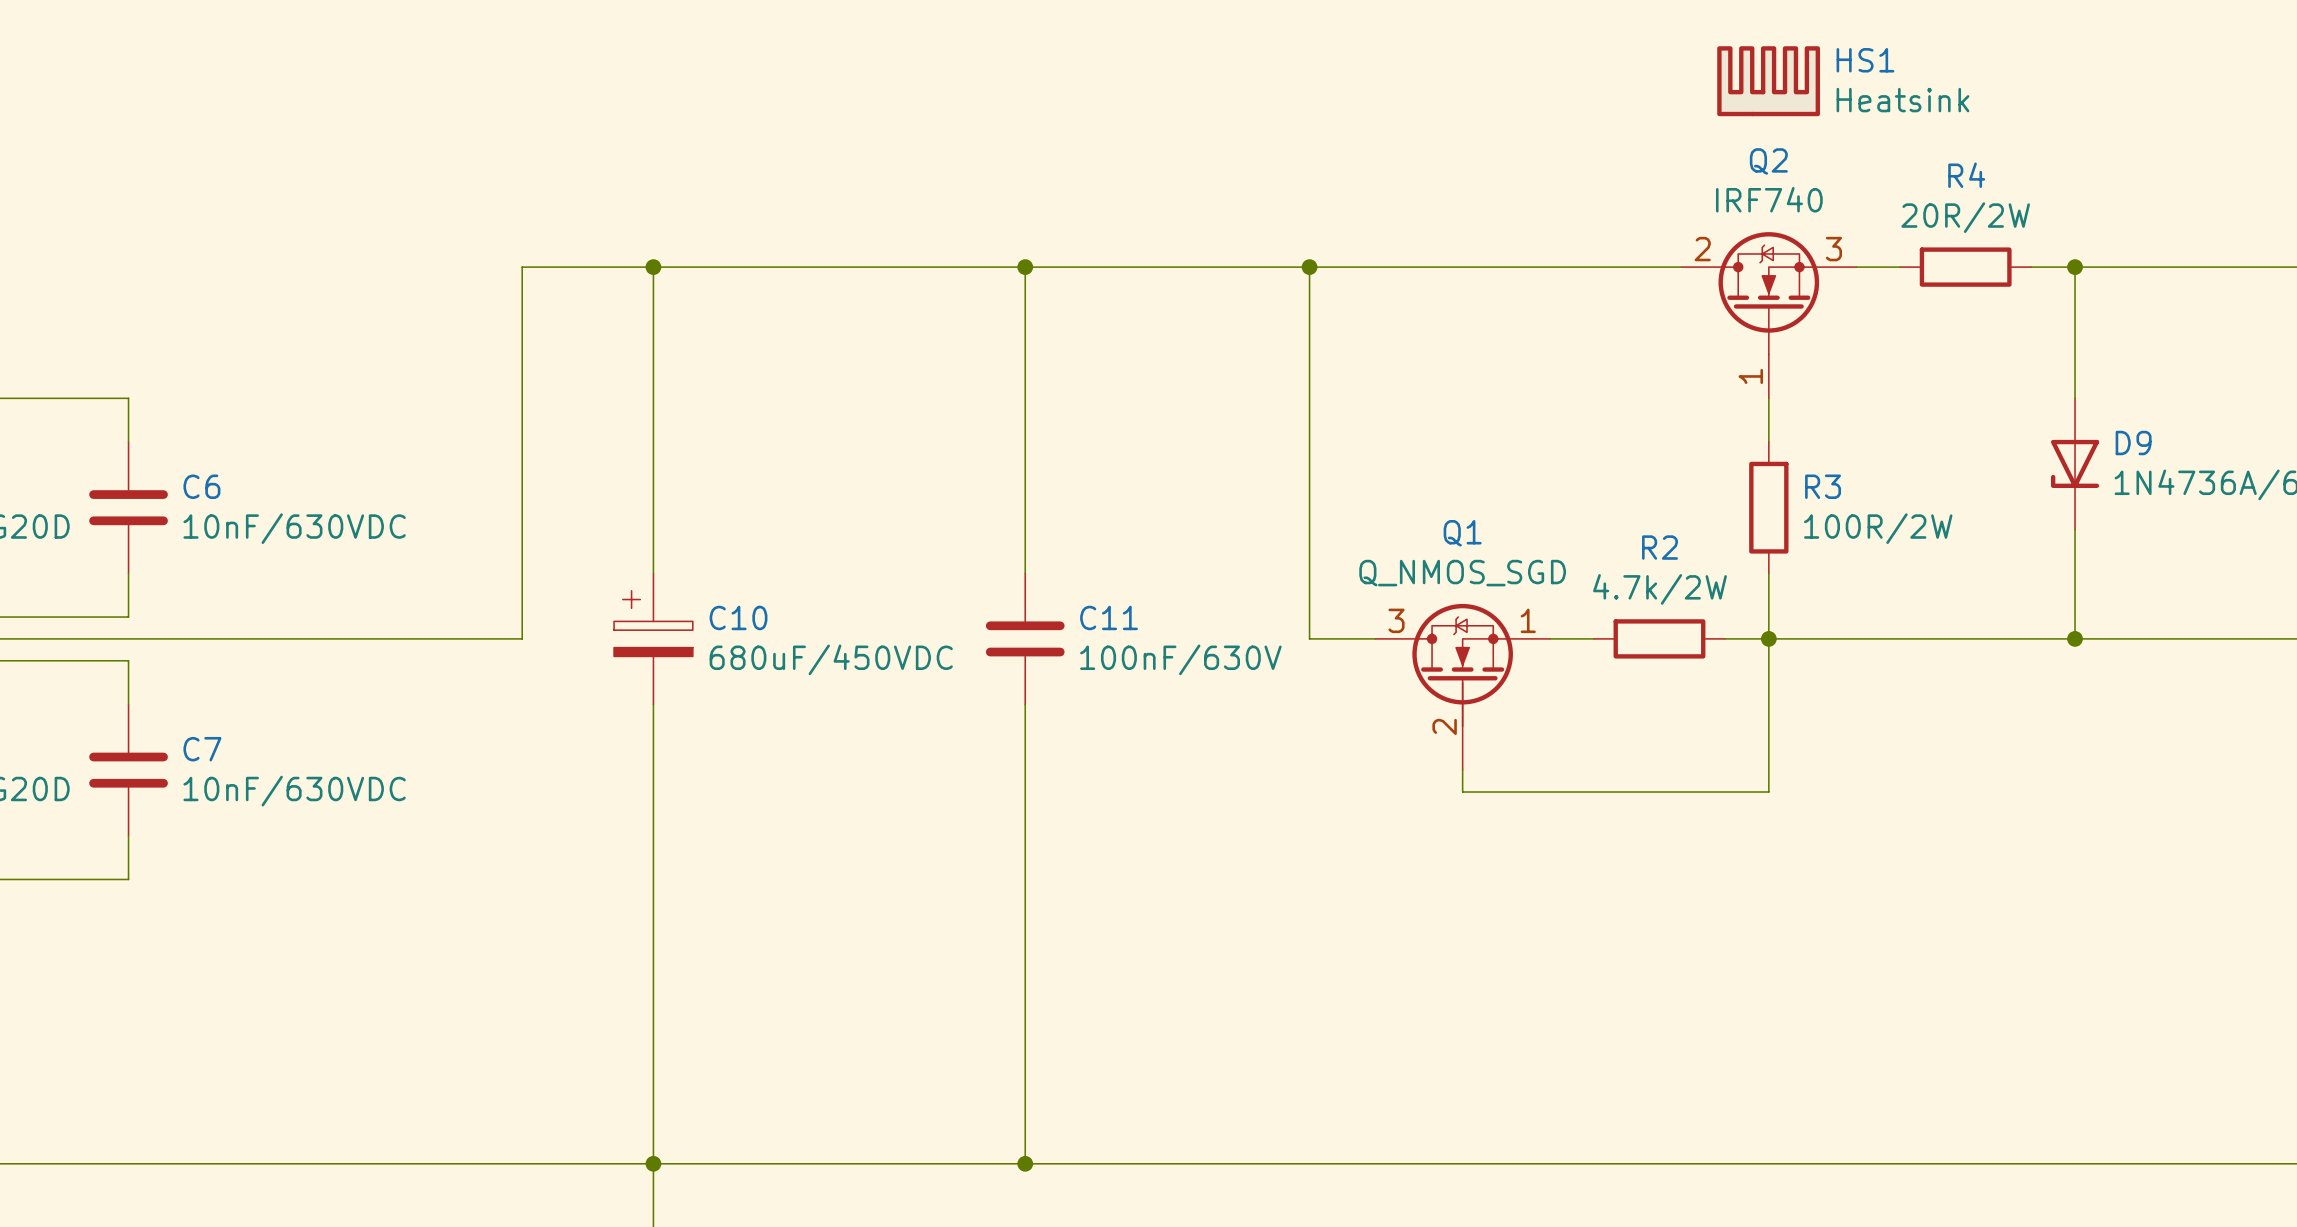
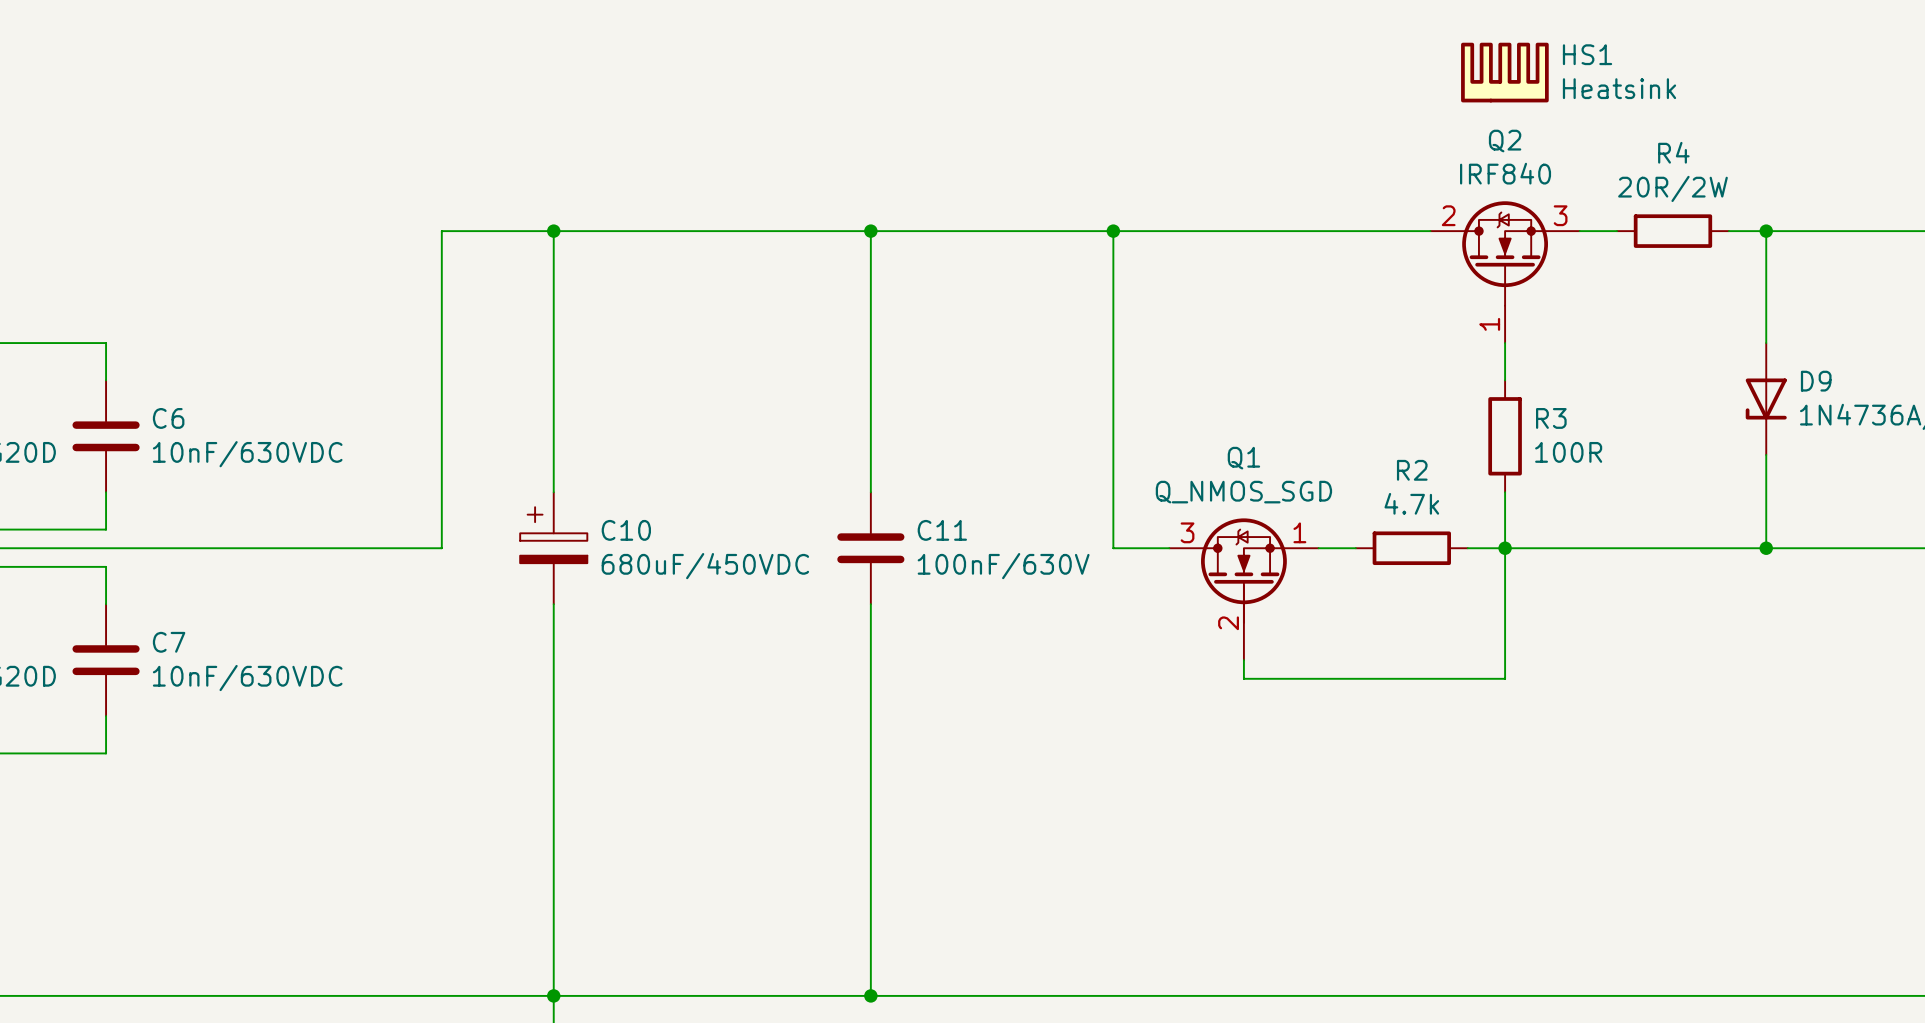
Q2 value: IRF740 (1769, 199) -> IRF840 (1505, 173)
R3 value: 100R/2W (1878, 528) -> 100R (1568, 452)
R2 value: 4.7k/2W (1660, 589) -> 4.7k (1411, 503)

